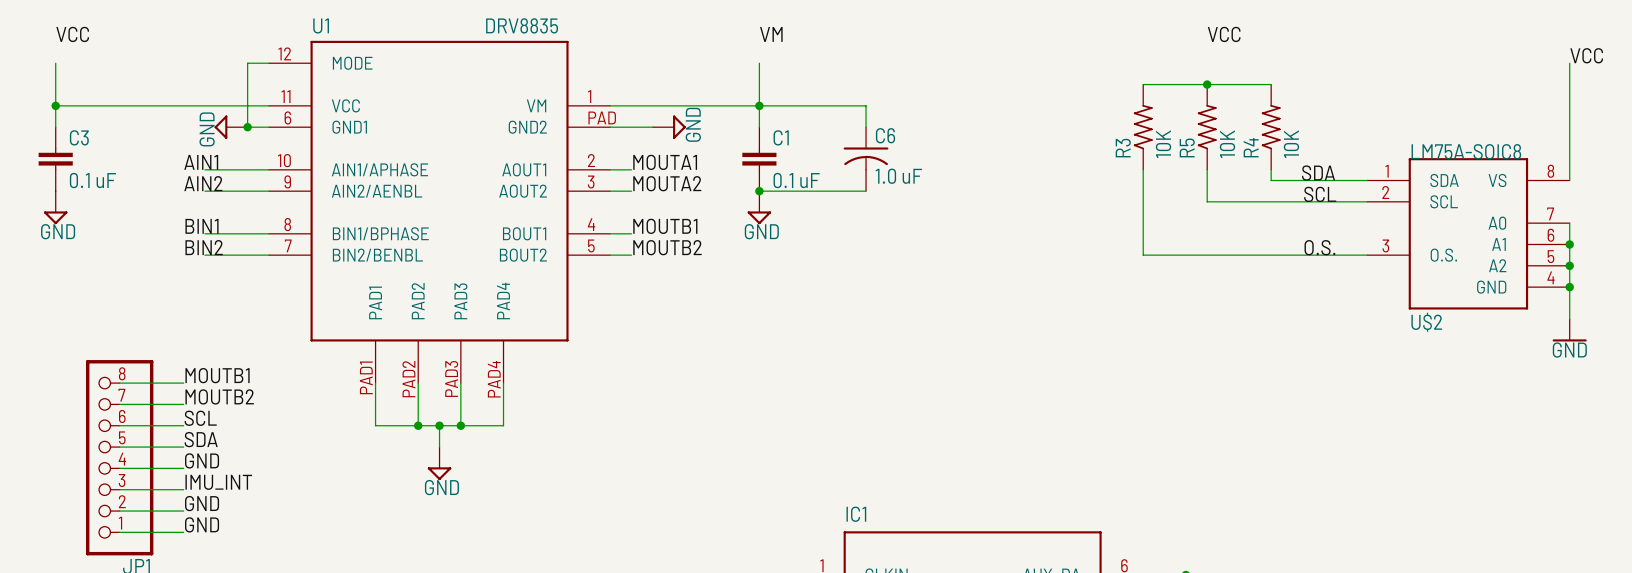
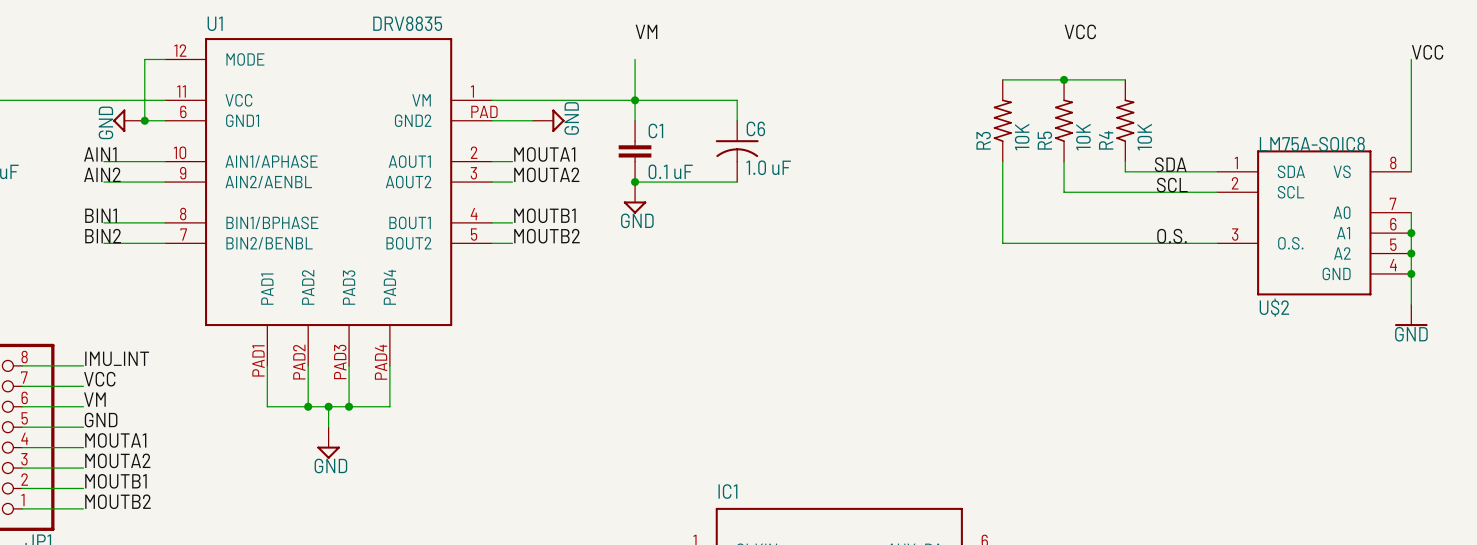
label: MOUTB1 (217, 375) -> IMU_INT (117, 358)
label: MOUTB2 (219, 396) -> VCC (99, 379)
label: SCL (200, 418) -> VM (94, 399)
label: SDA (201, 439) -> GND (101, 420)
label: GND (202, 460) -> MOUTA1 (115, 440)
label: IMU_INT (218, 482) -> MOUTA2 (117, 460)
label: GND (202, 503) -> MOUTB1 (115, 481)
label: GND (202, 524) -> MOUTB2 (117, 501)

